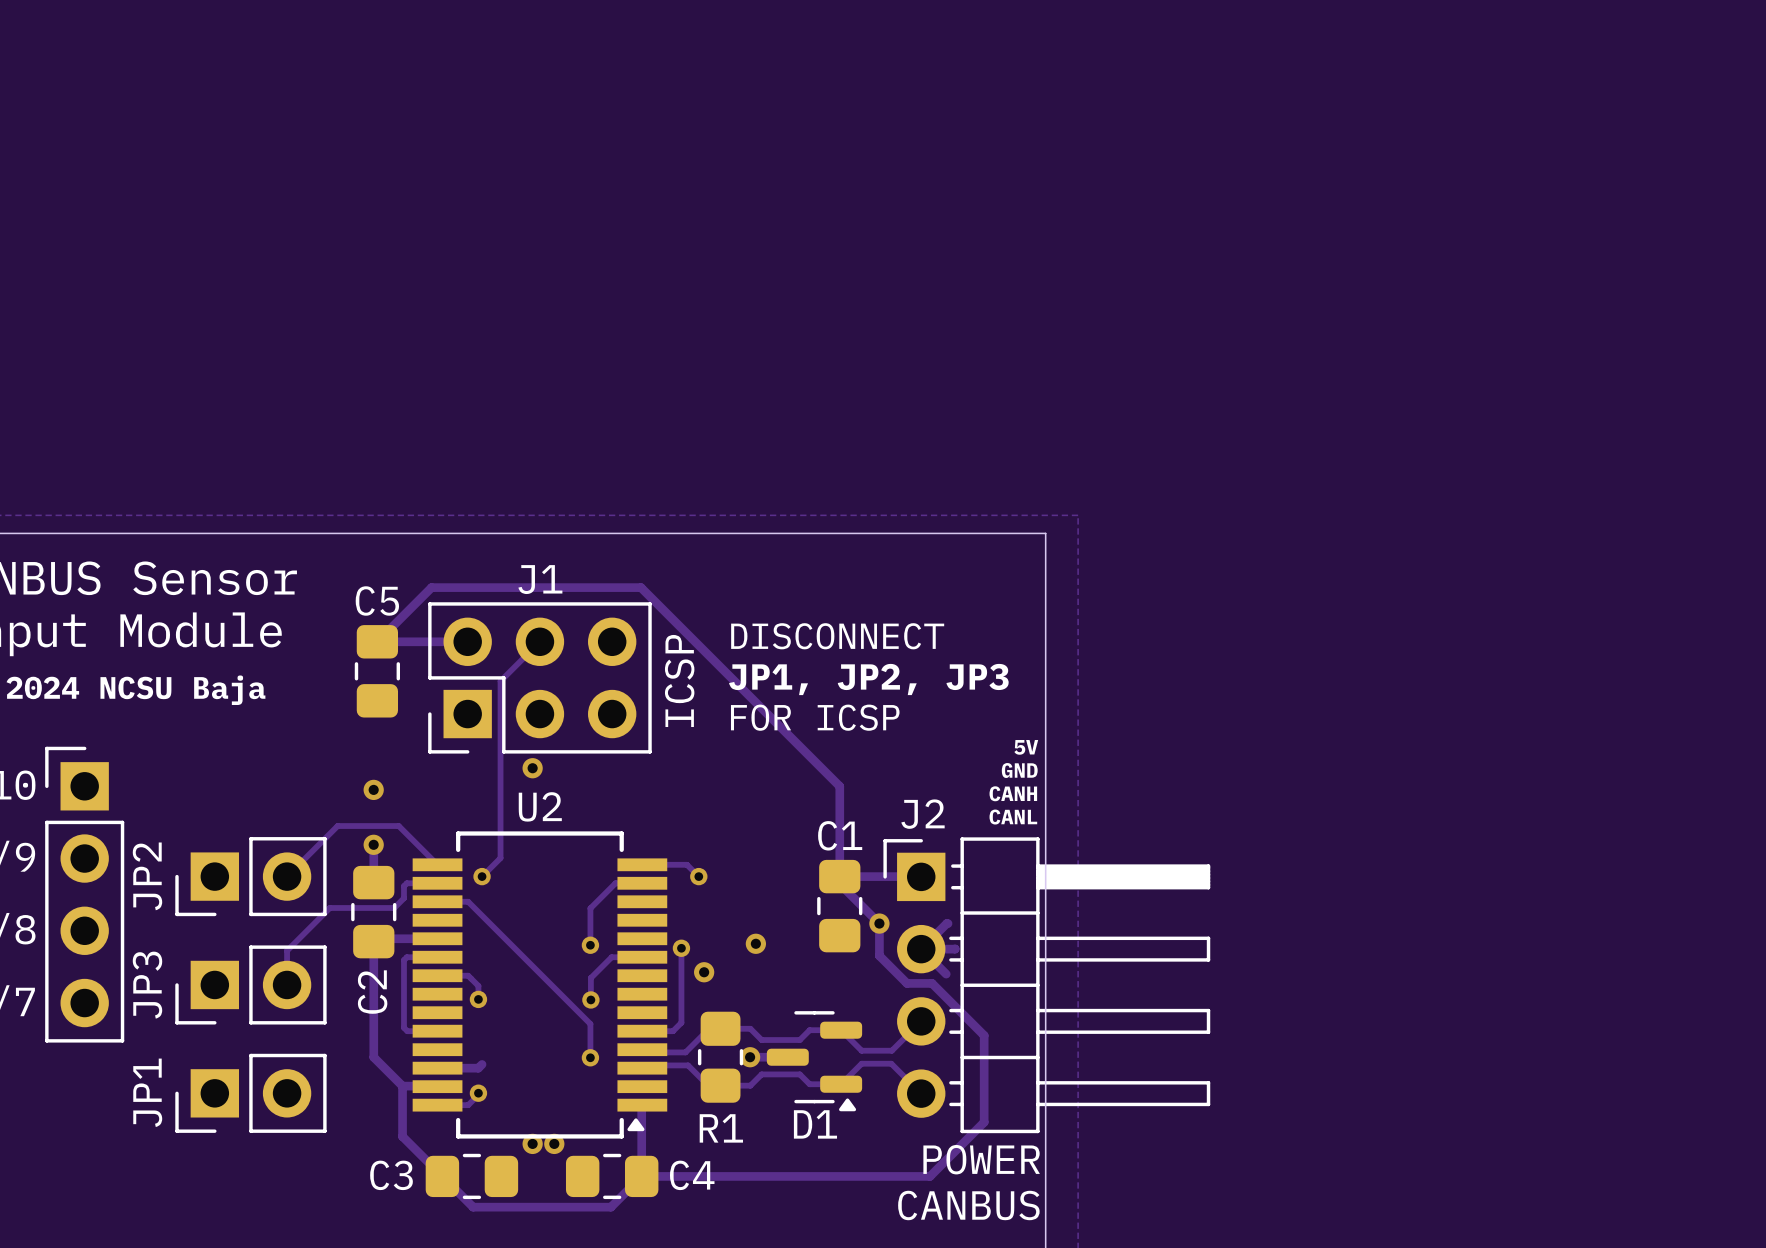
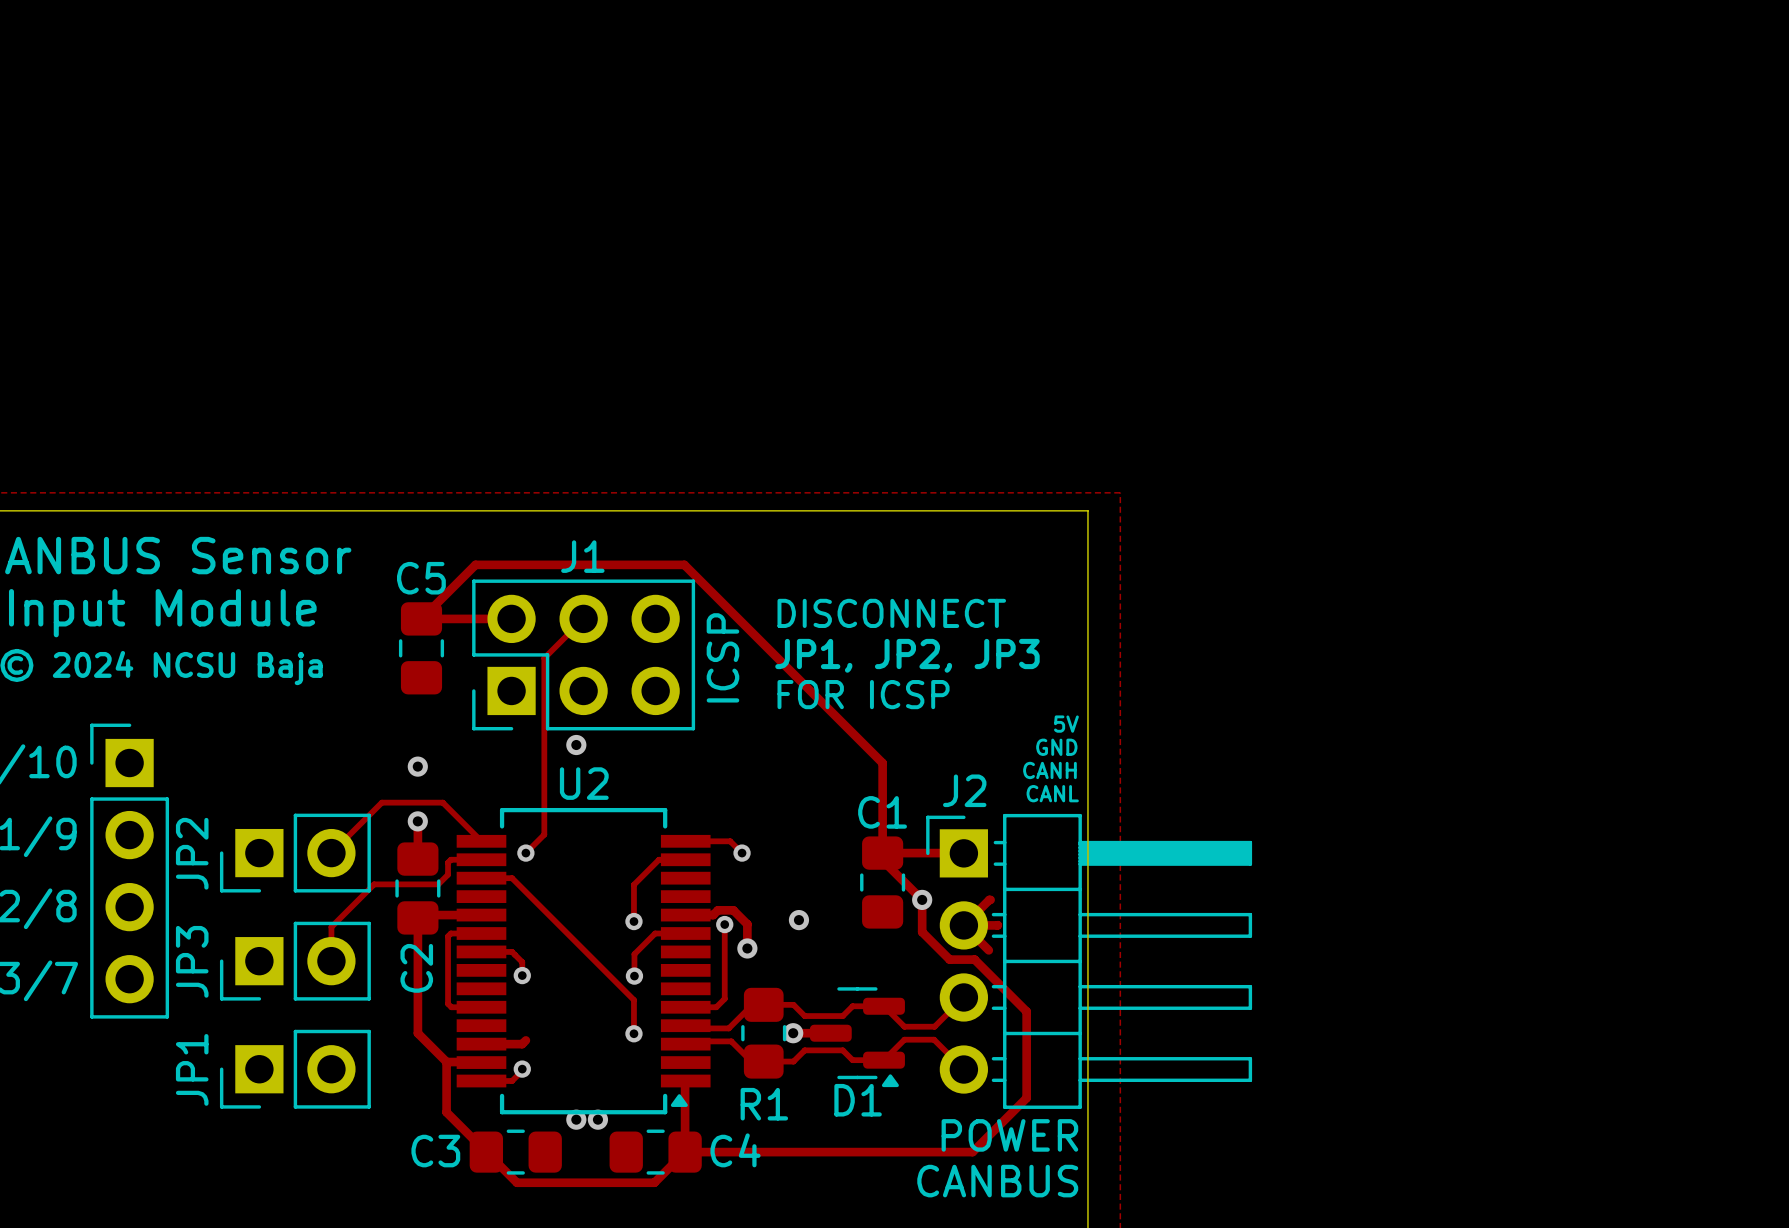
track: none -> (685, 915) (713, 915) (717, 910) (733, 910) (747, 924) (747, 948)

